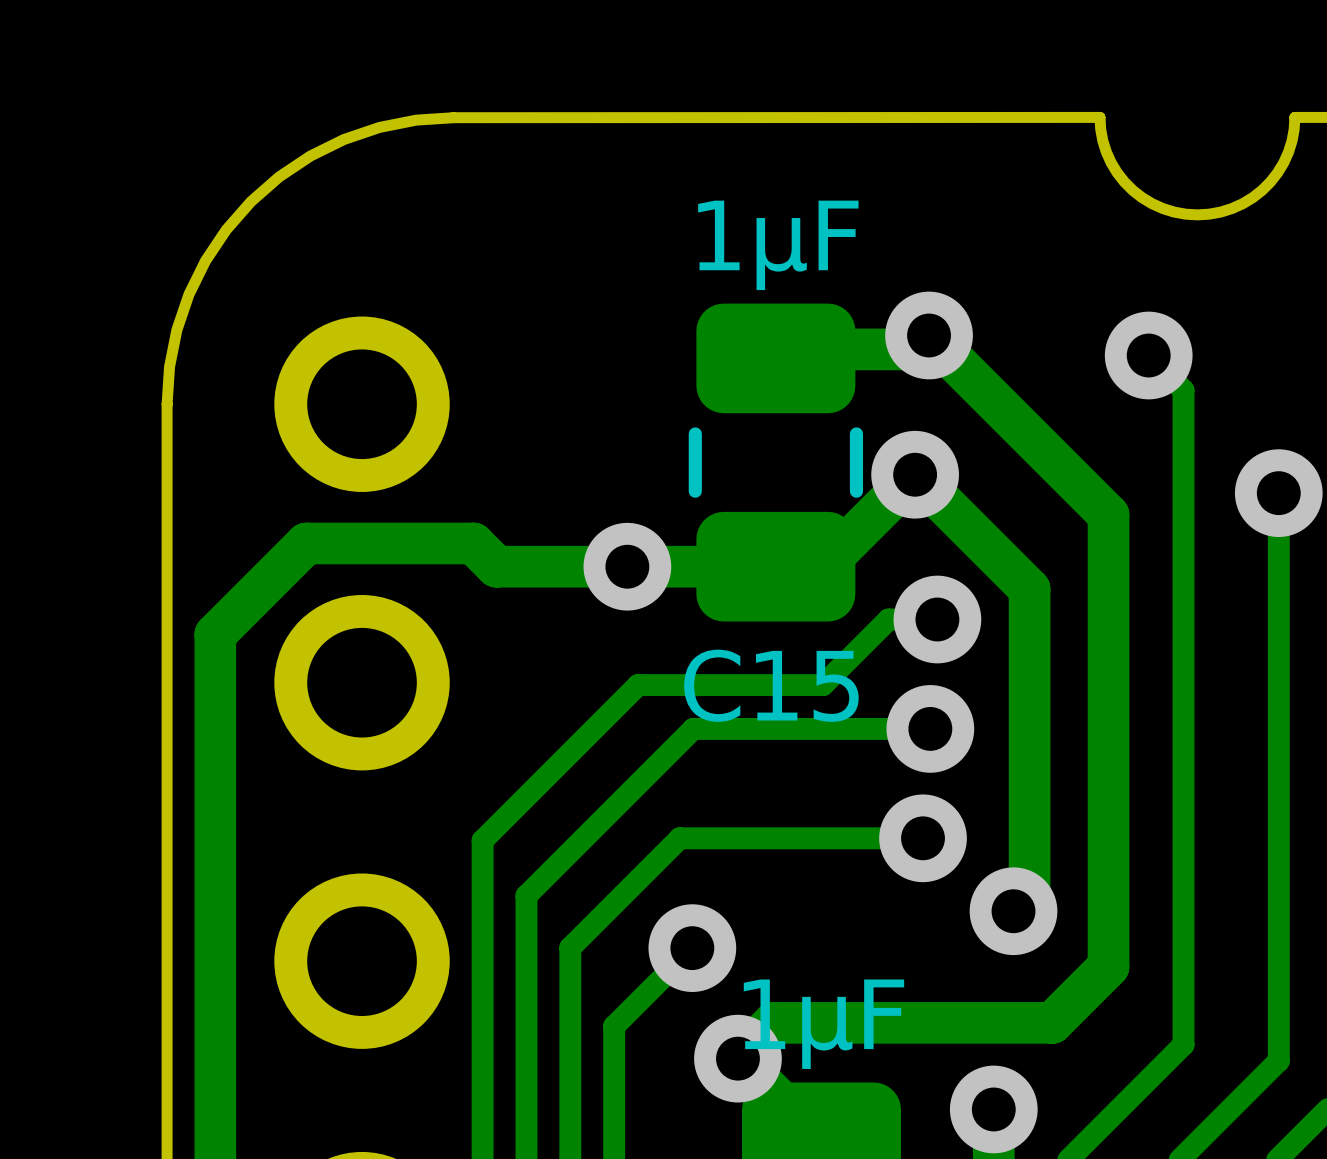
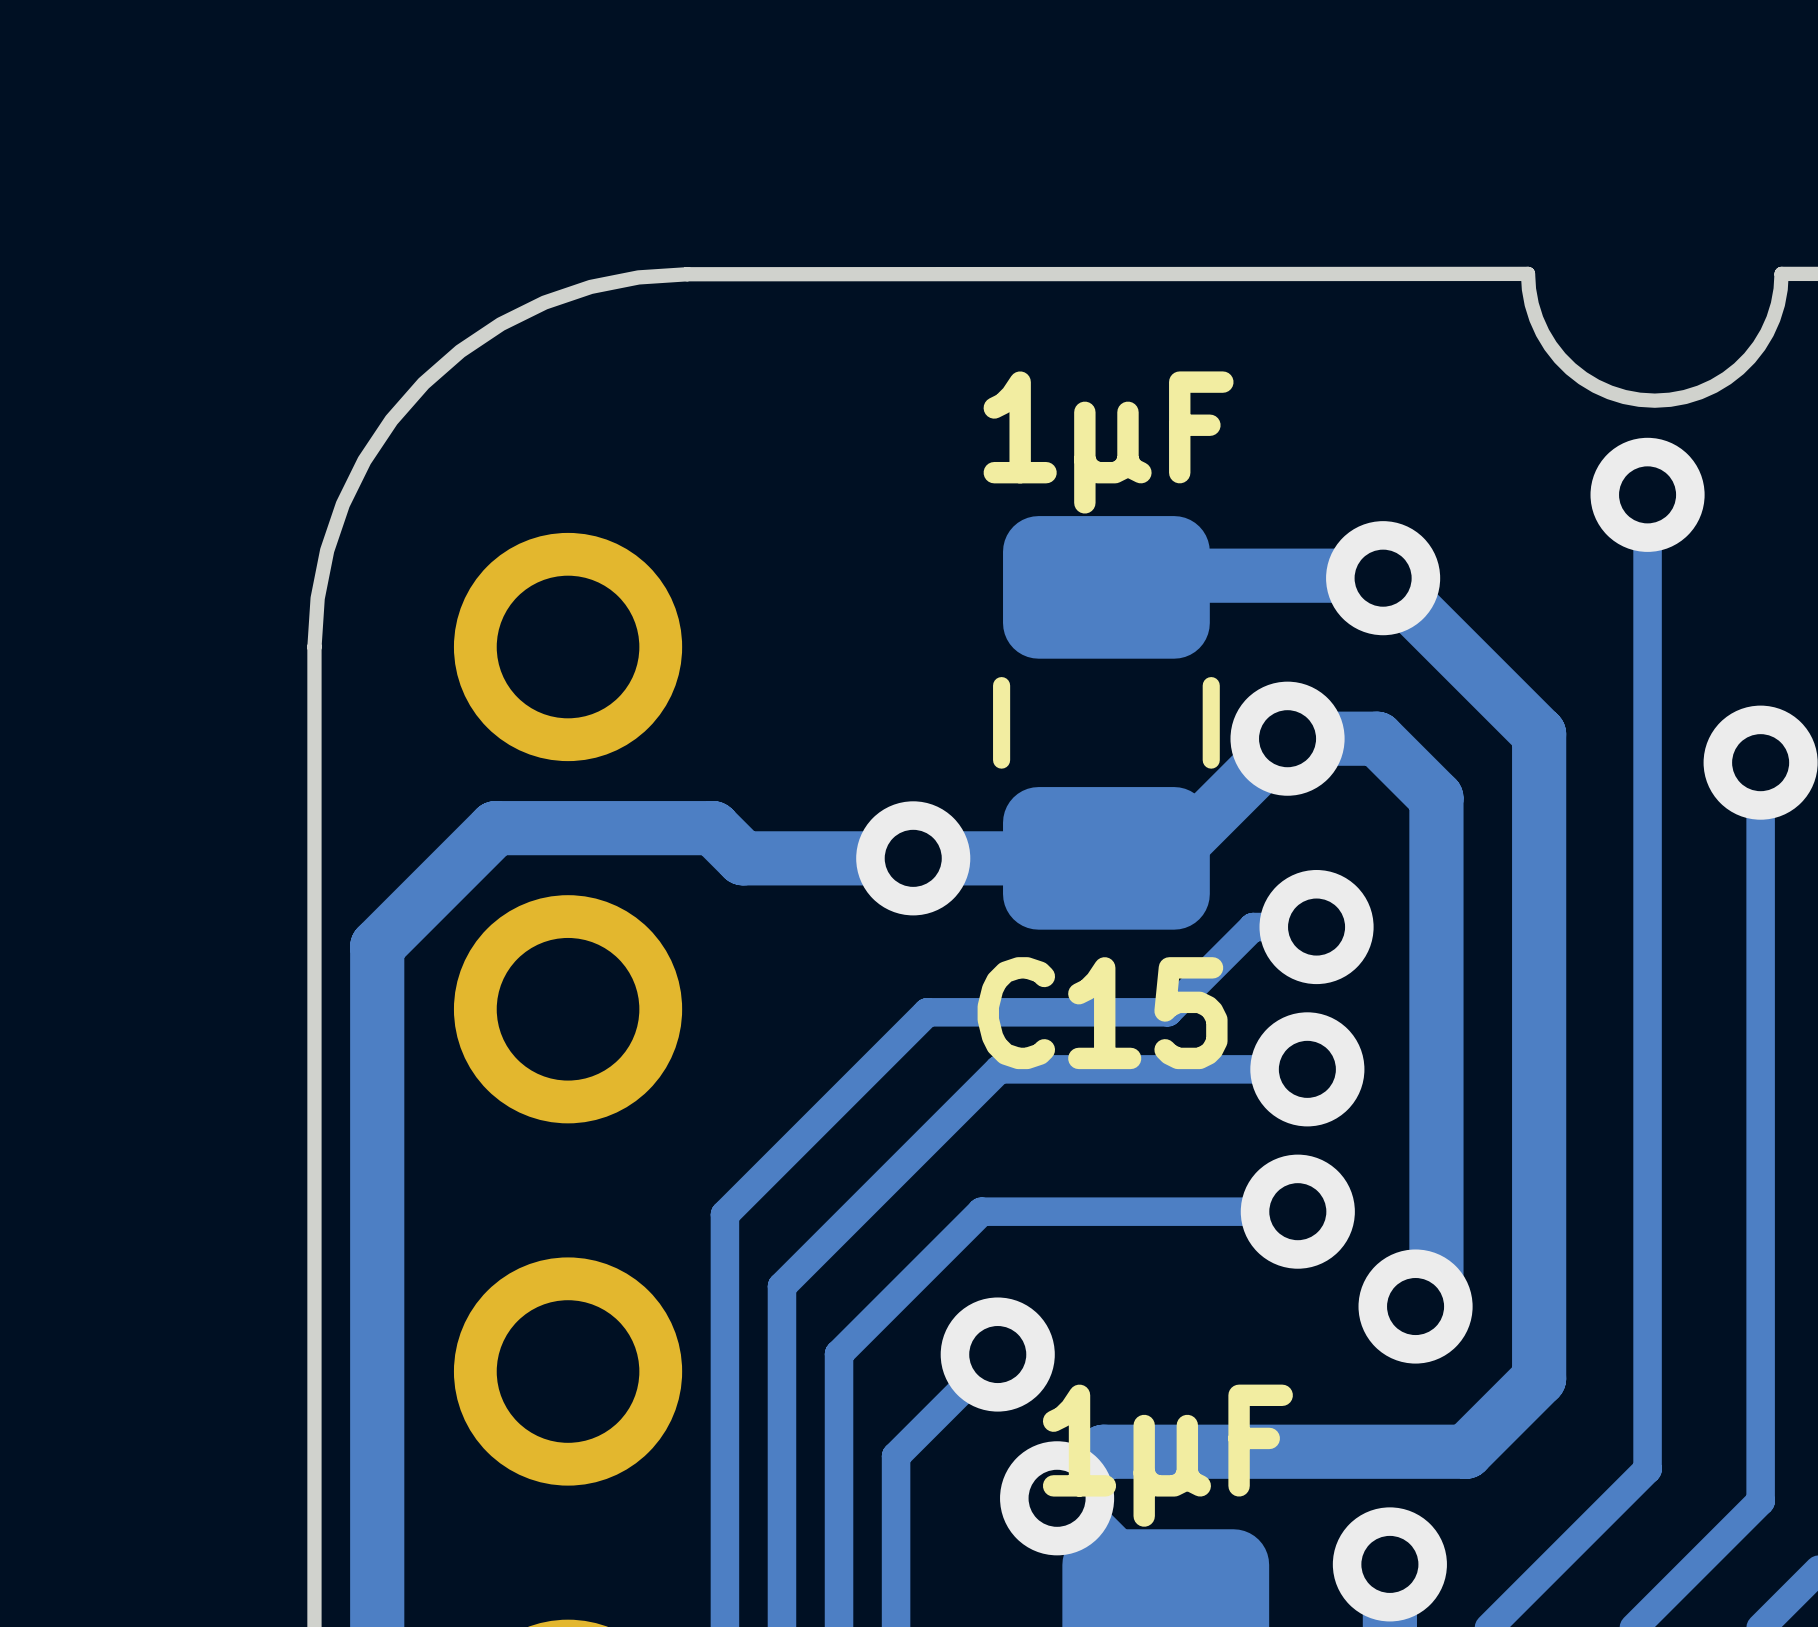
via position: (929, 335) -> (1383, 578)
track: (915, 349) (929, 335) (1108, 514) -> (1287, 575) (1380, 575) (1539, 734) (1539, 791)
track: (1148, 355) (1183, 390) (1183, 1044) -> (1647, 494) (1647, 1469) (1636, 1480)
via position: (1148, 355) -> (1647, 494)
track: (915, 474) (1029, 589) -> (1287, 738) (1377, 738) (1436, 798) (1436, 887)

